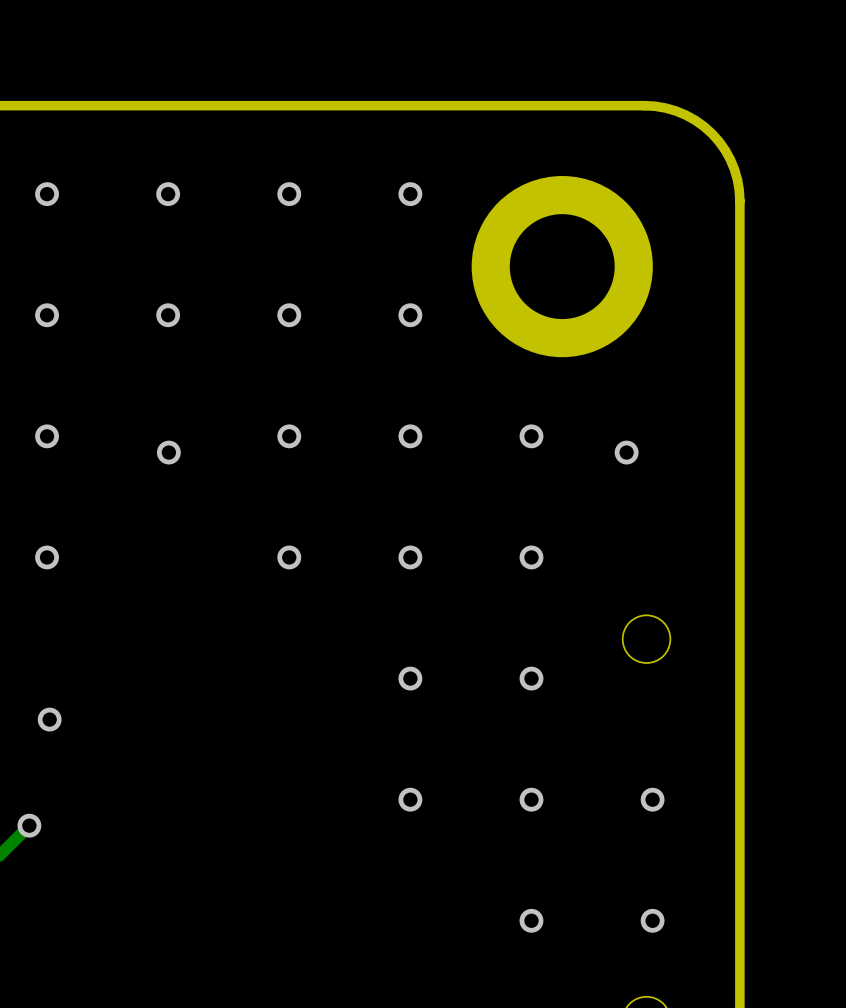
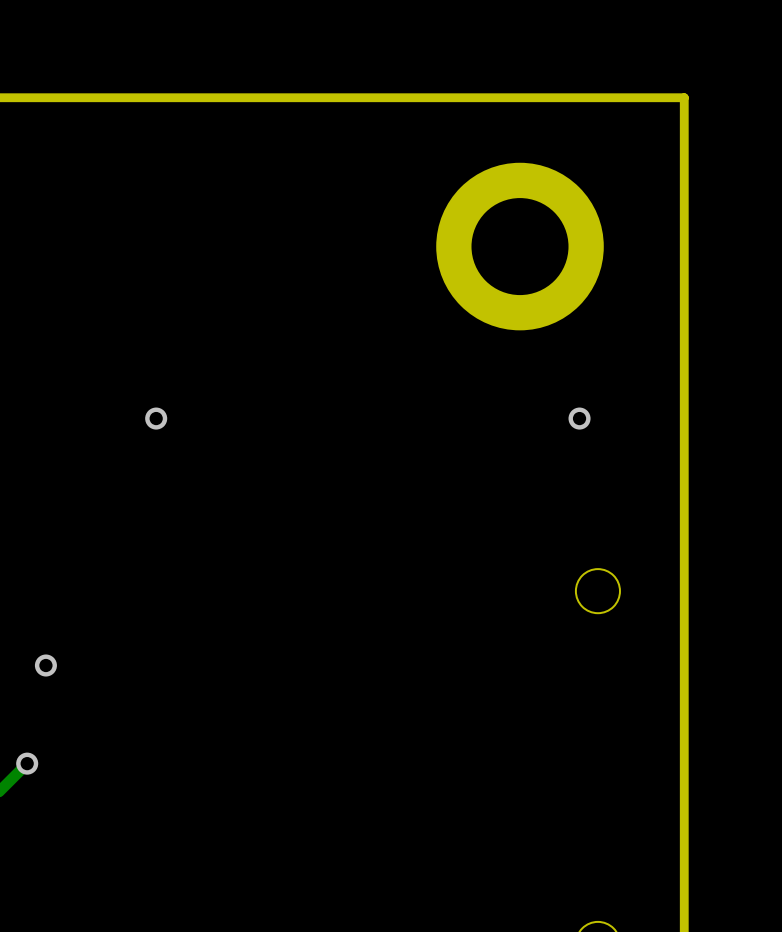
board edge: (644, 105) (665, 108) (685, 115) (711, 133) (725, 150) (734, 169) (739, 201) -> (596, 97) (684, 97) (684, 185)
via: (47, 194) -> none
via: (168, 194) -> none
via: (289, 194) -> none
via: (410, 194) -> none
via: (47, 315) -> none
via: (168, 315) -> none
via: (289, 315) -> none
via: (410, 315) -> none
via: (47, 436) -> none
via: (289, 436) -> none
via: (410, 436) -> none
via: (531, 436) -> none
via: (47, 557) -> none
via: (289, 557) -> none
via: (410, 557) -> none
via: (531, 557) -> none
via: (410, 678) -> none
via: (531, 678) -> none
via: (410, 799) -> none
via: (531, 799) -> none
via: (652, 799) -> none
via: (531, 920) -> none
via: (652, 920) -> none

